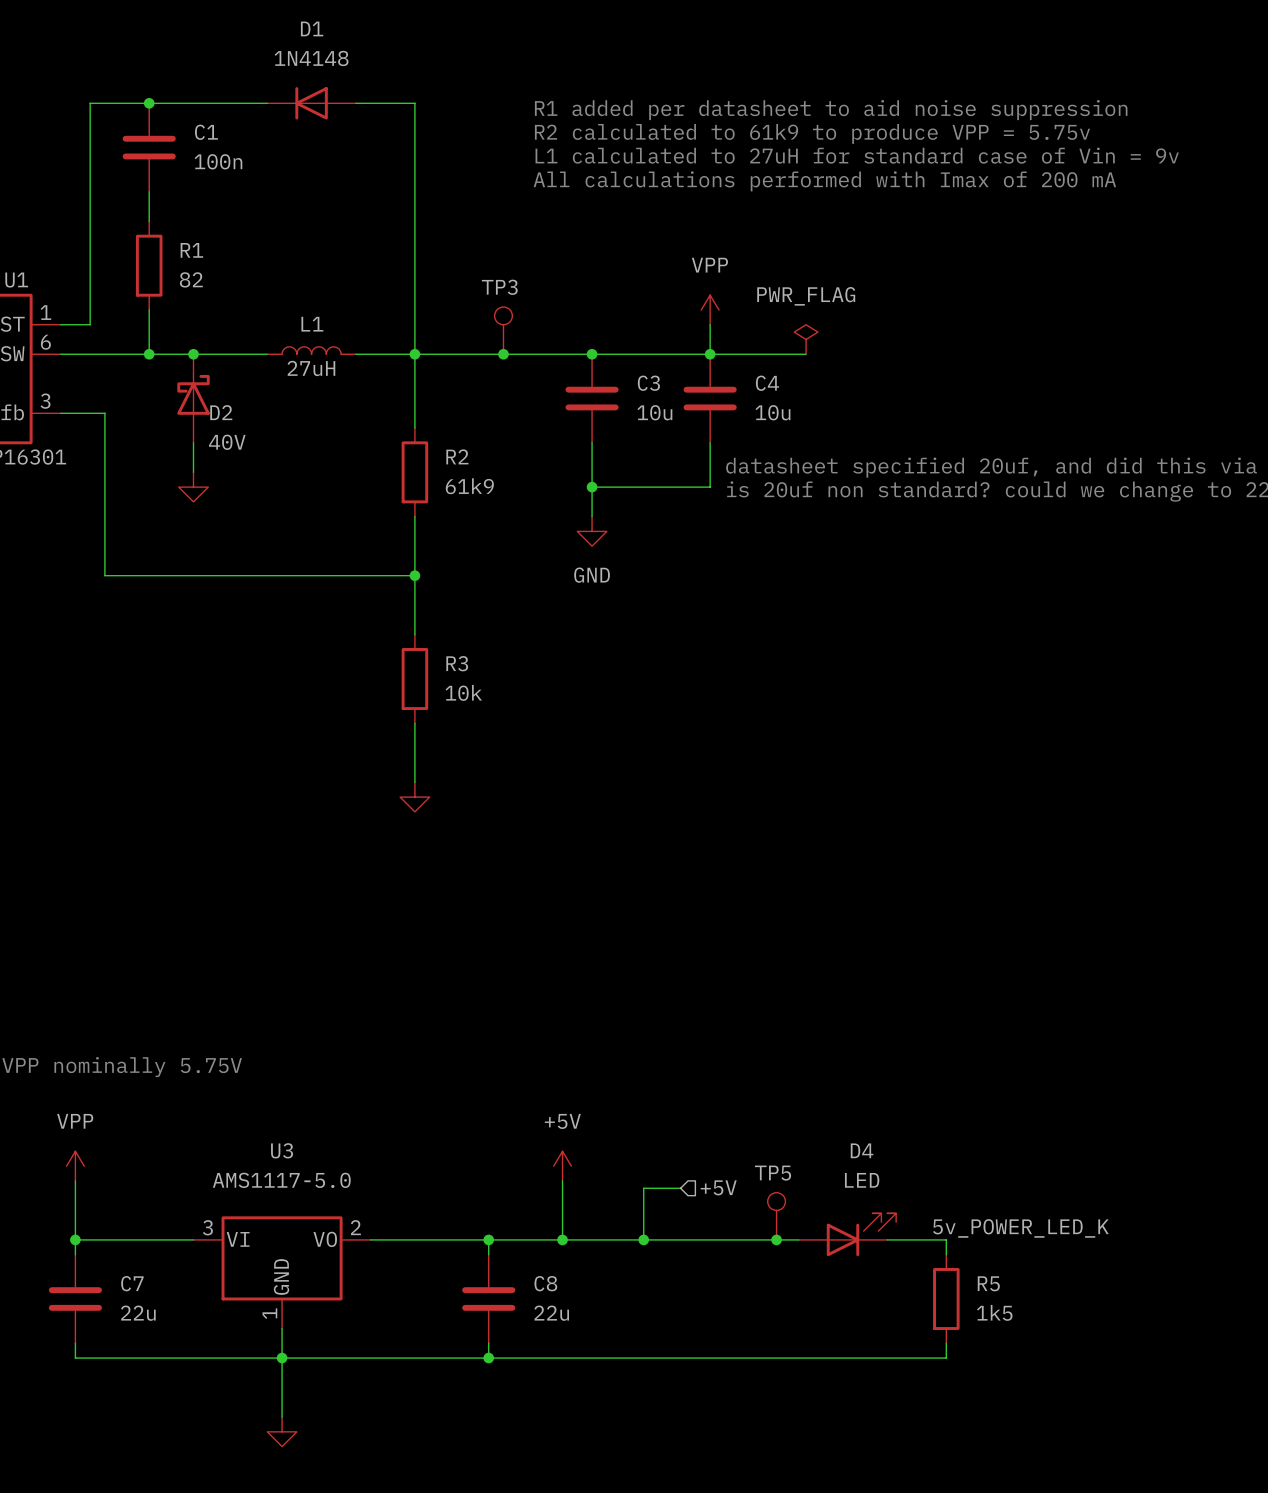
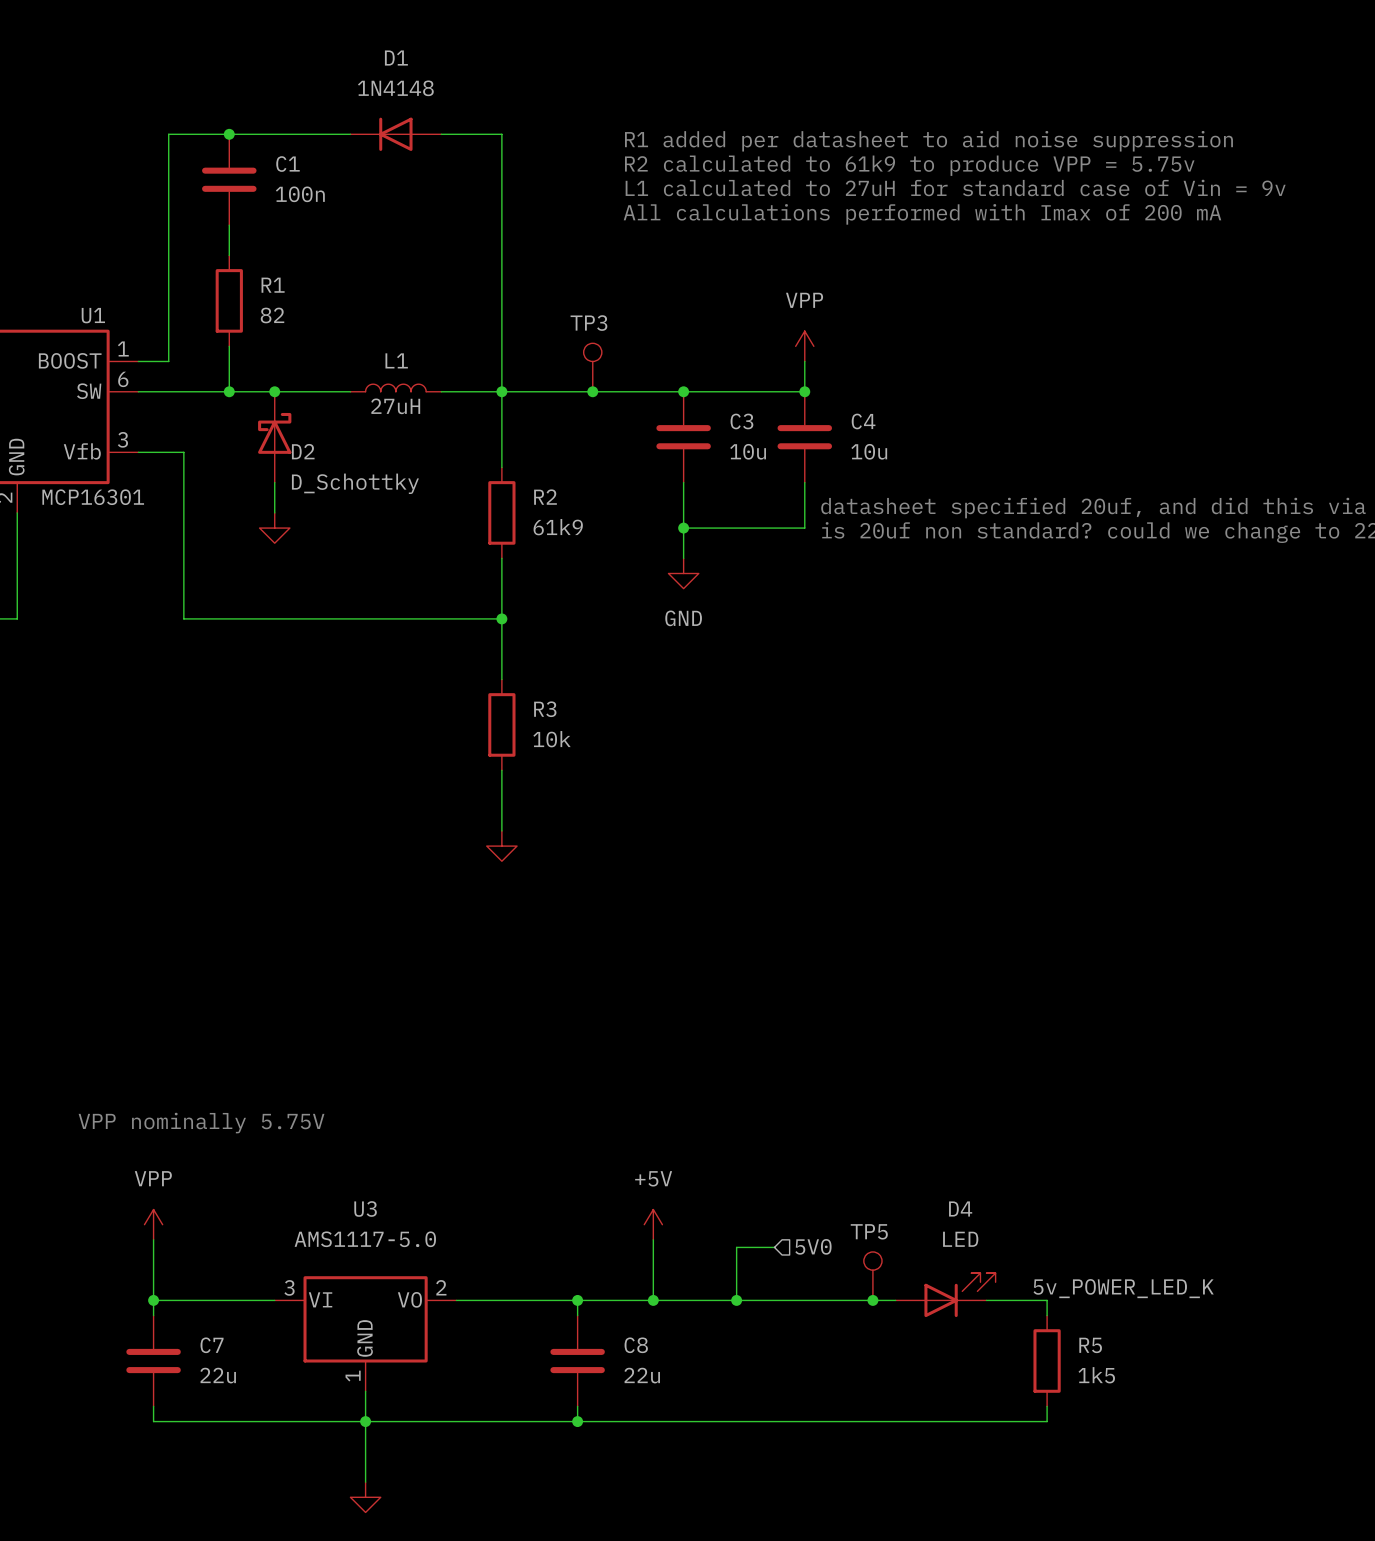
power symbol: PWR_FLAG (806, 339) -> none
wire: (710, 354) (806, 354) -> none
D2 value: 40V (227, 442) -> D_Schottky (355, 483)
hierarchical label: +5V (718, 1187) -> 5V0 (813, 1246)

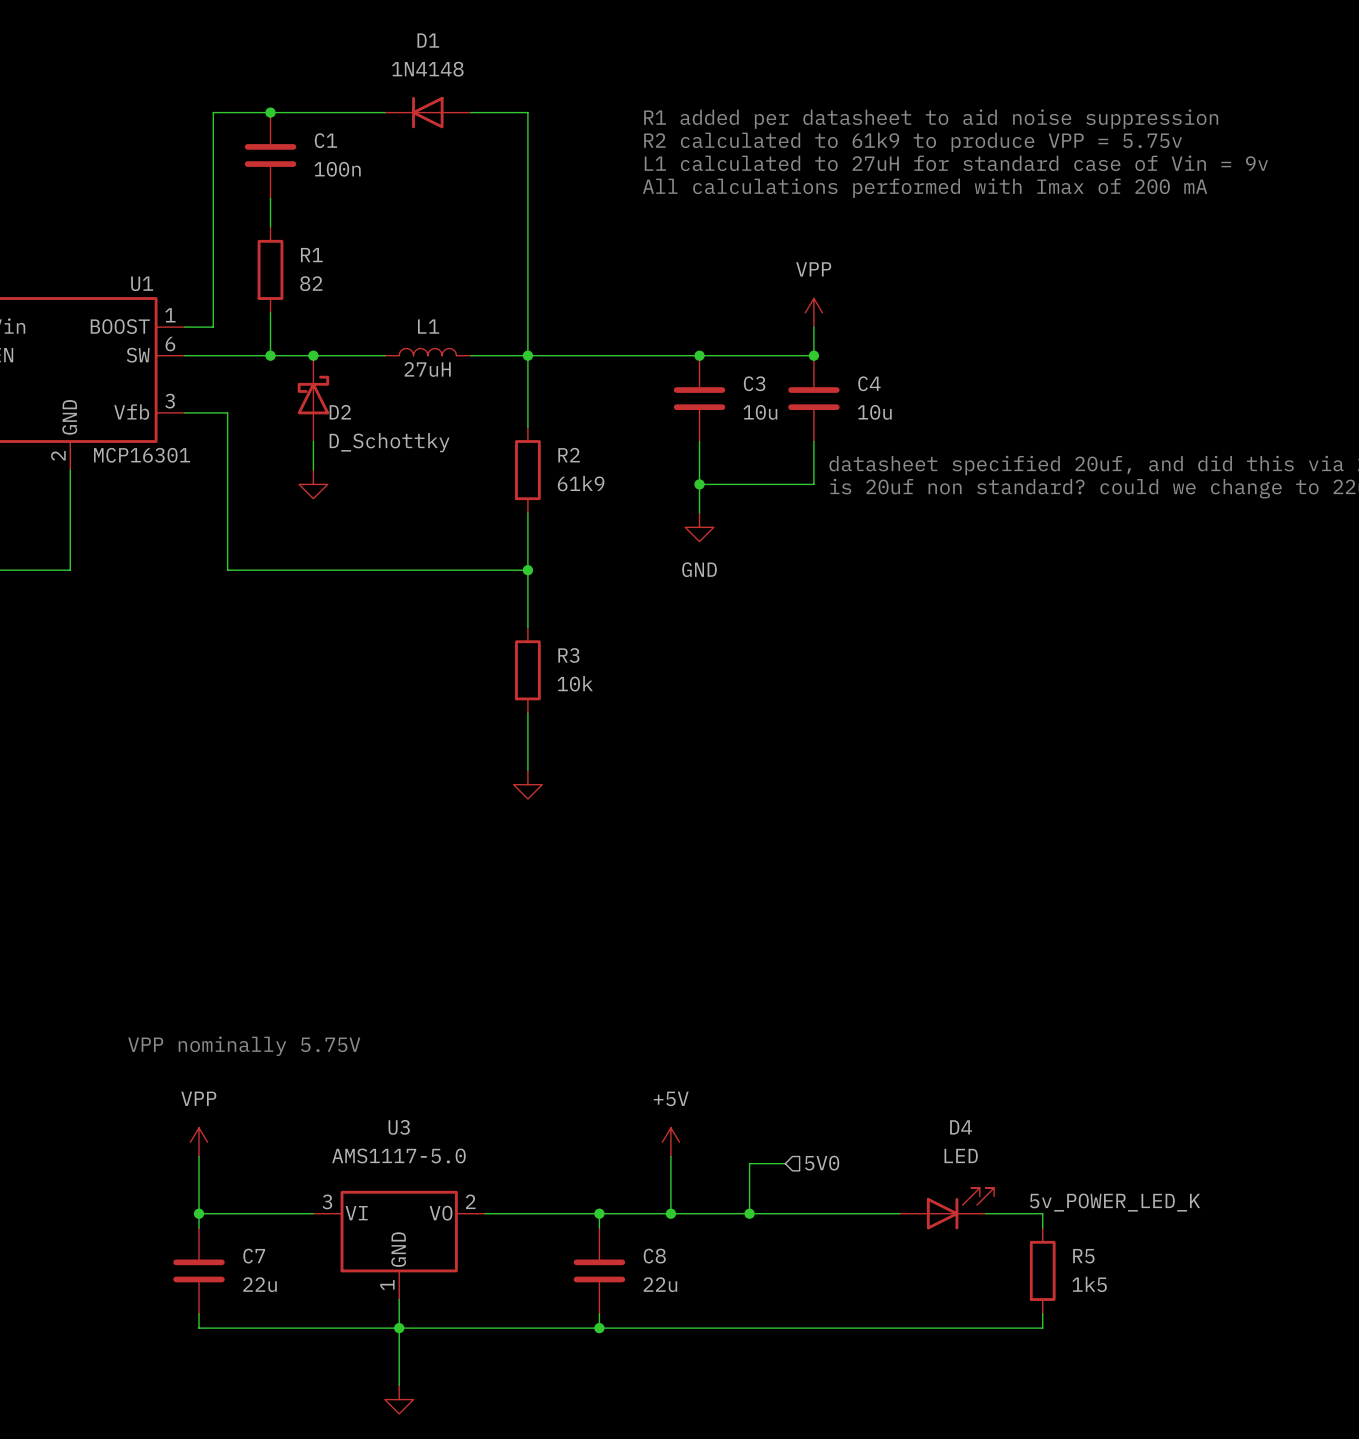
TP3: (592, 367) -> none
junction: (592, 391) -> none
TP5: (872, 1276) -> none
junction: (872, 1300) -> none

